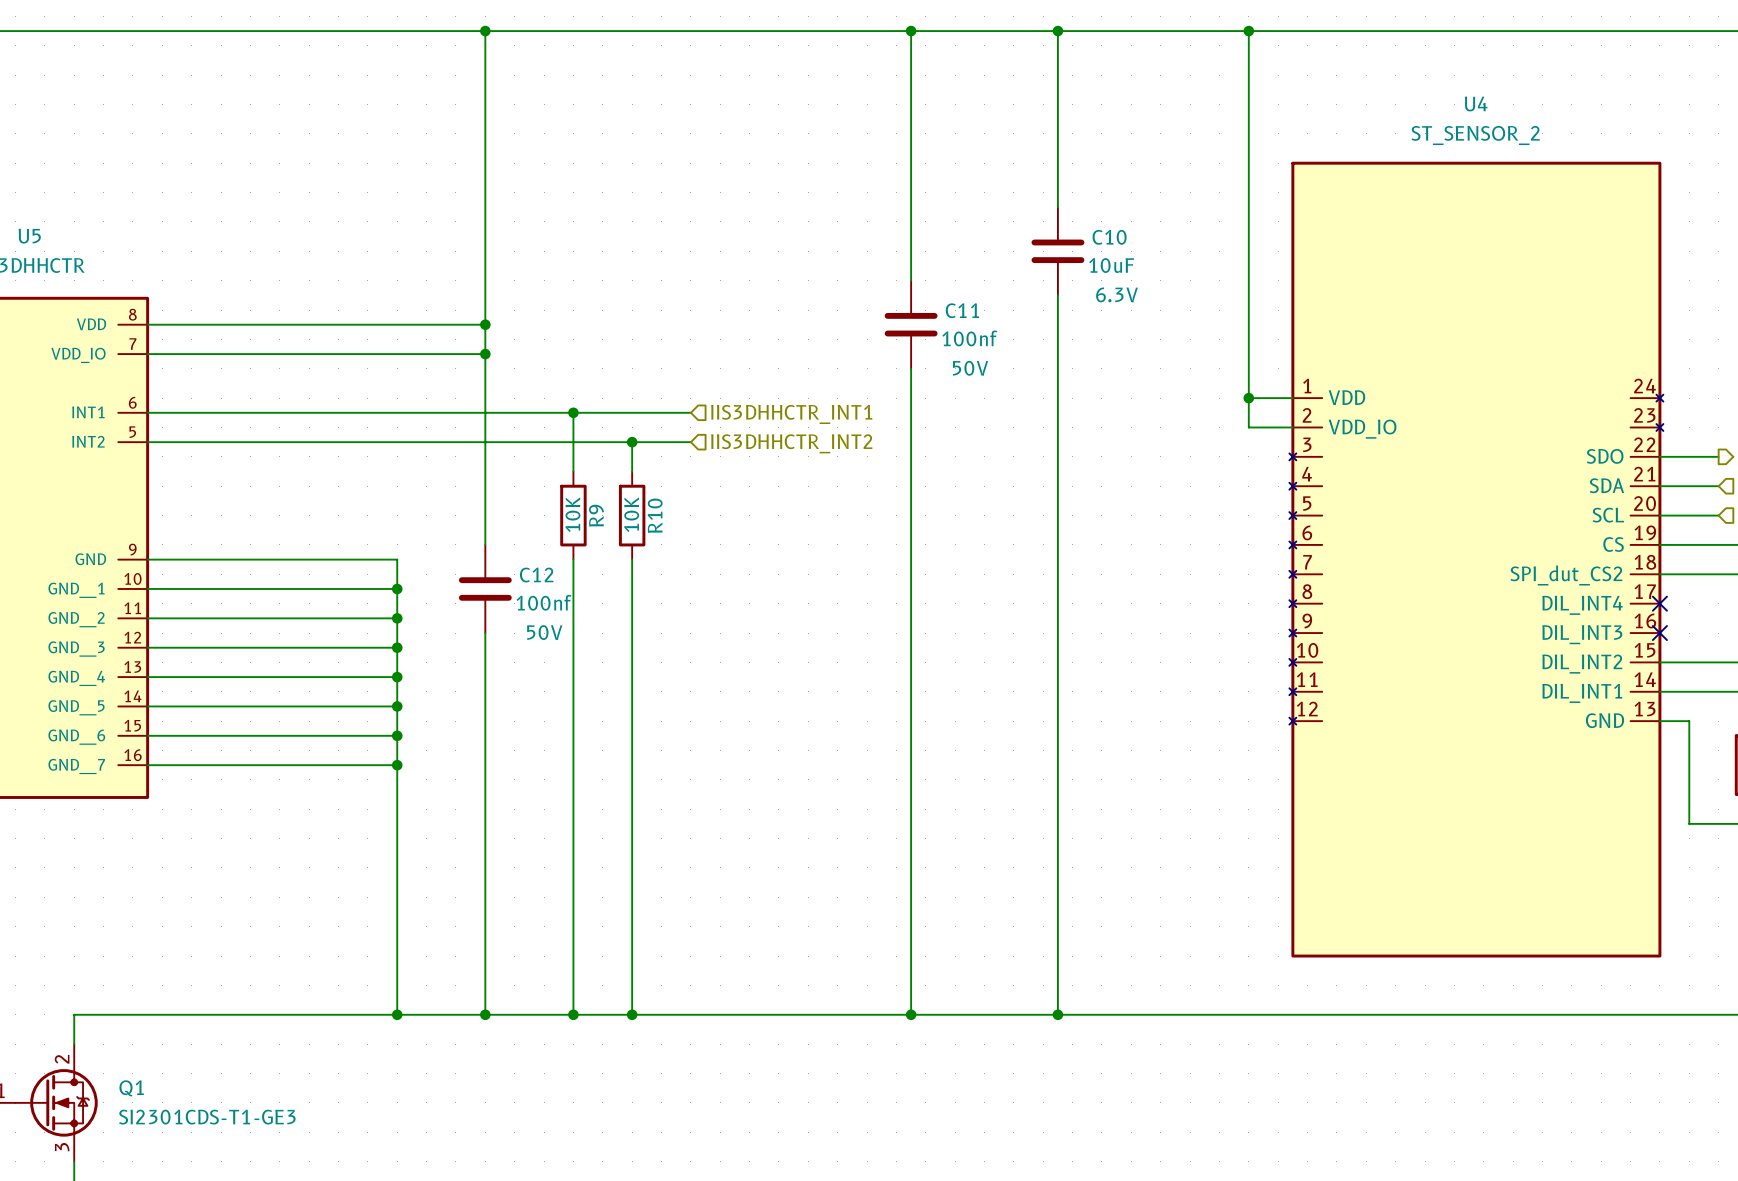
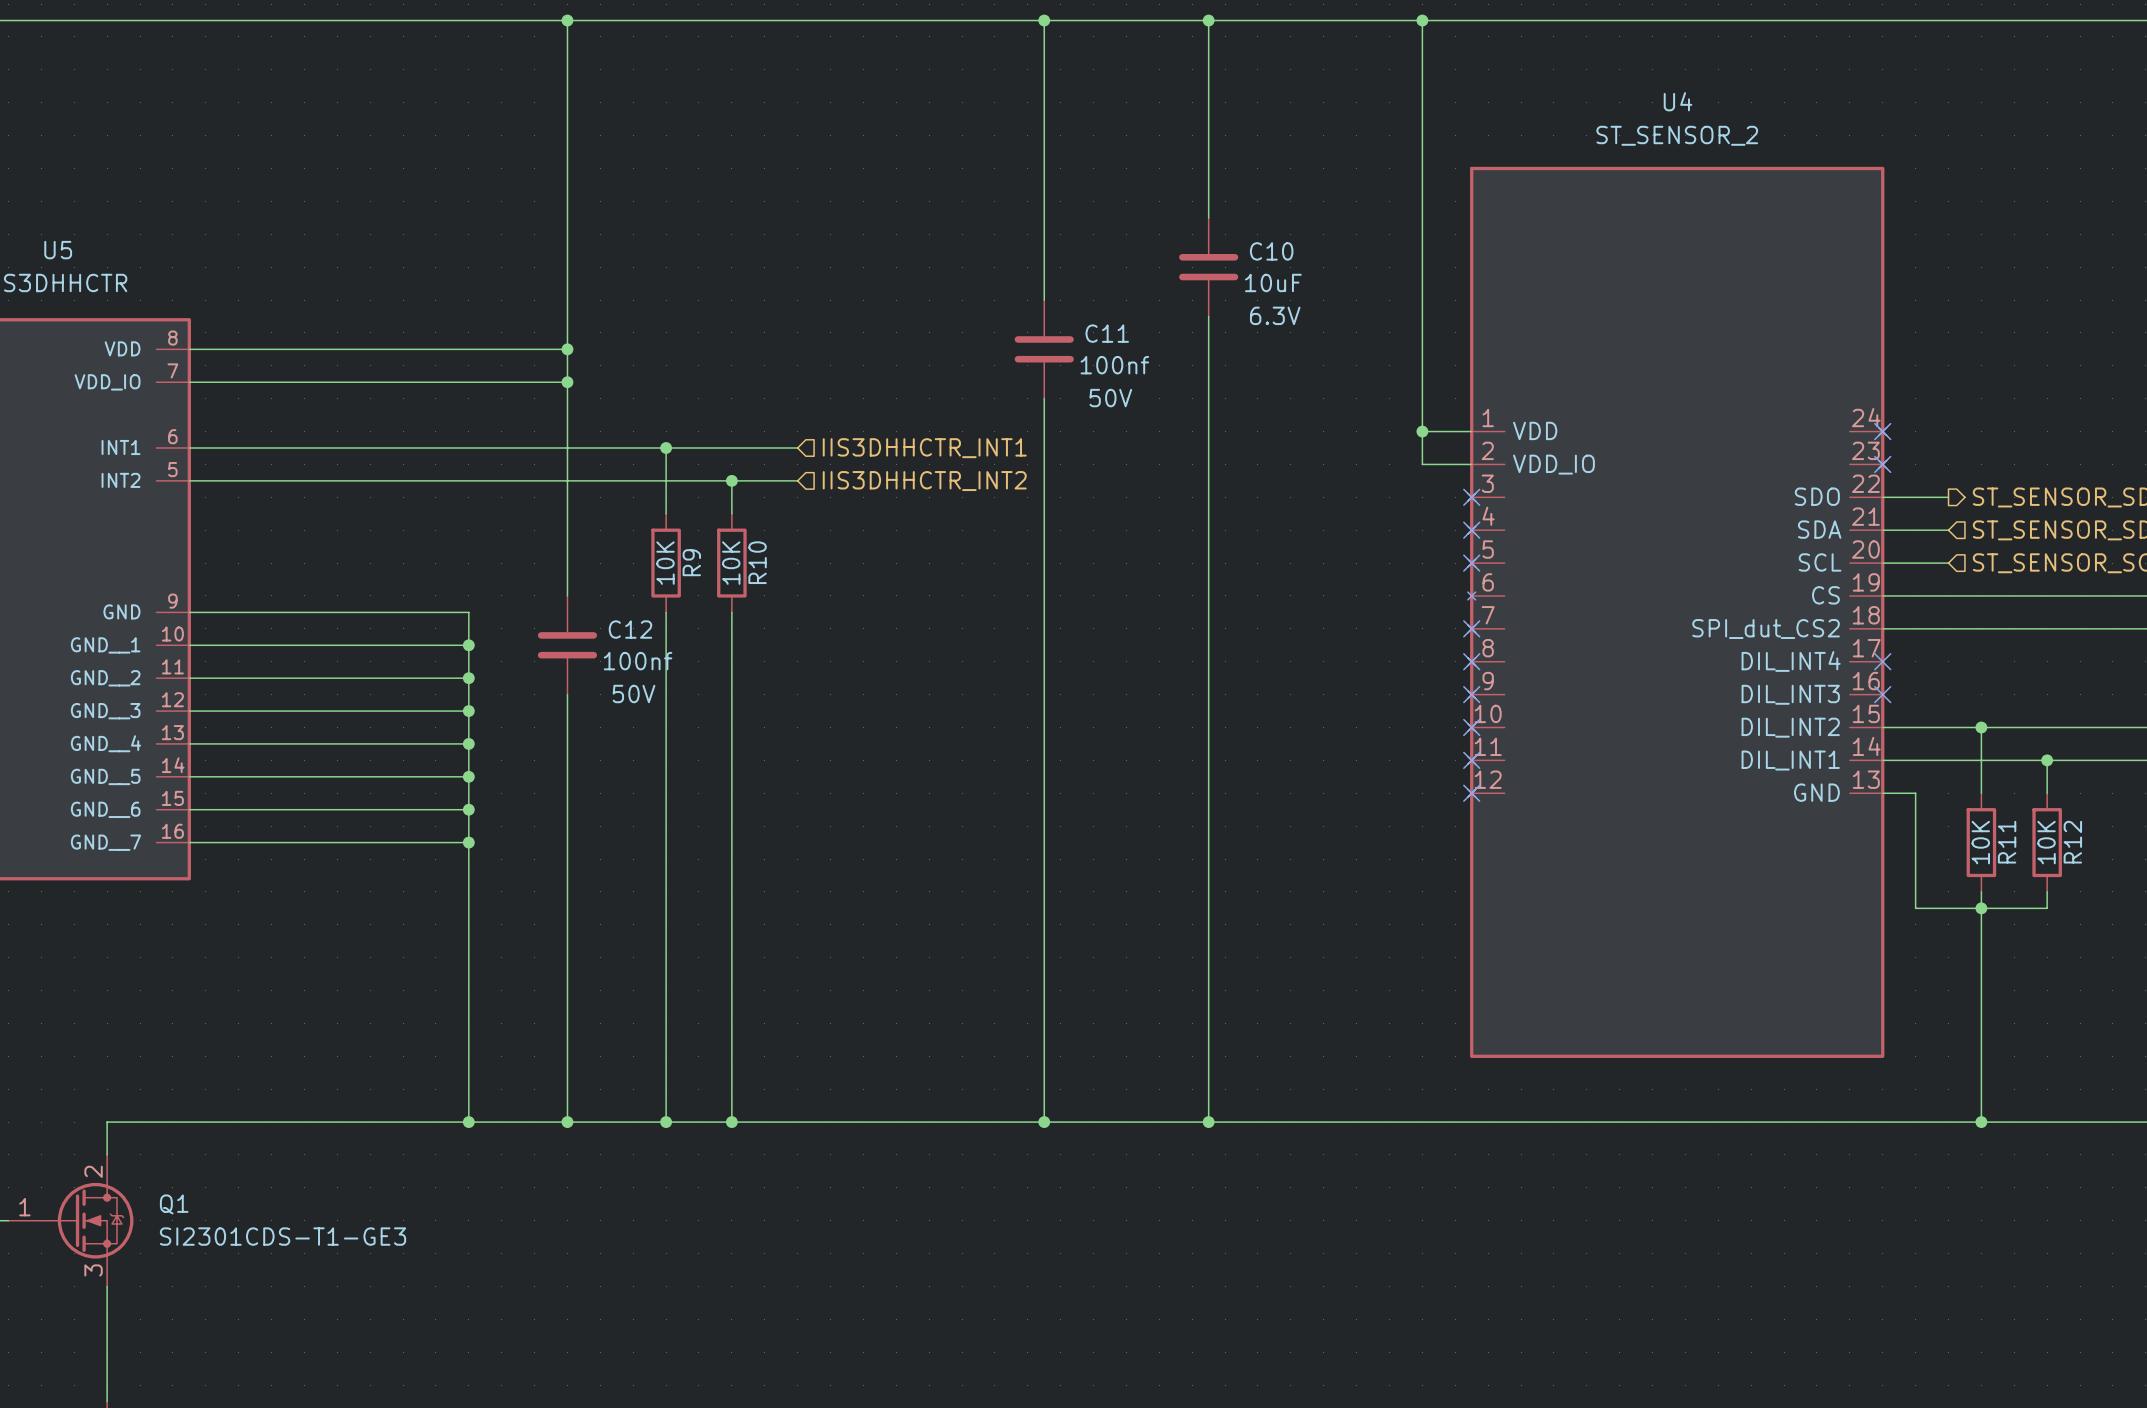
no-connect mark: none -> (1882, 431)
no-connect mark: none -> (1882, 464)
no-connect mark: none -> (1471, 497)
no-connect mark: none -> (1471, 530)
no-connect mark: none -> (1471, 563)
no-connect mark: none -> (1471, 628)
no-connect mark: none -> (1471, 661)
no-connect mark: none -> (1471, 694)
no-connect mark: none -> (1471, 727)
no-connect mark: none -> (1471, 760)
no-connect mark: none -> (1471, 793)

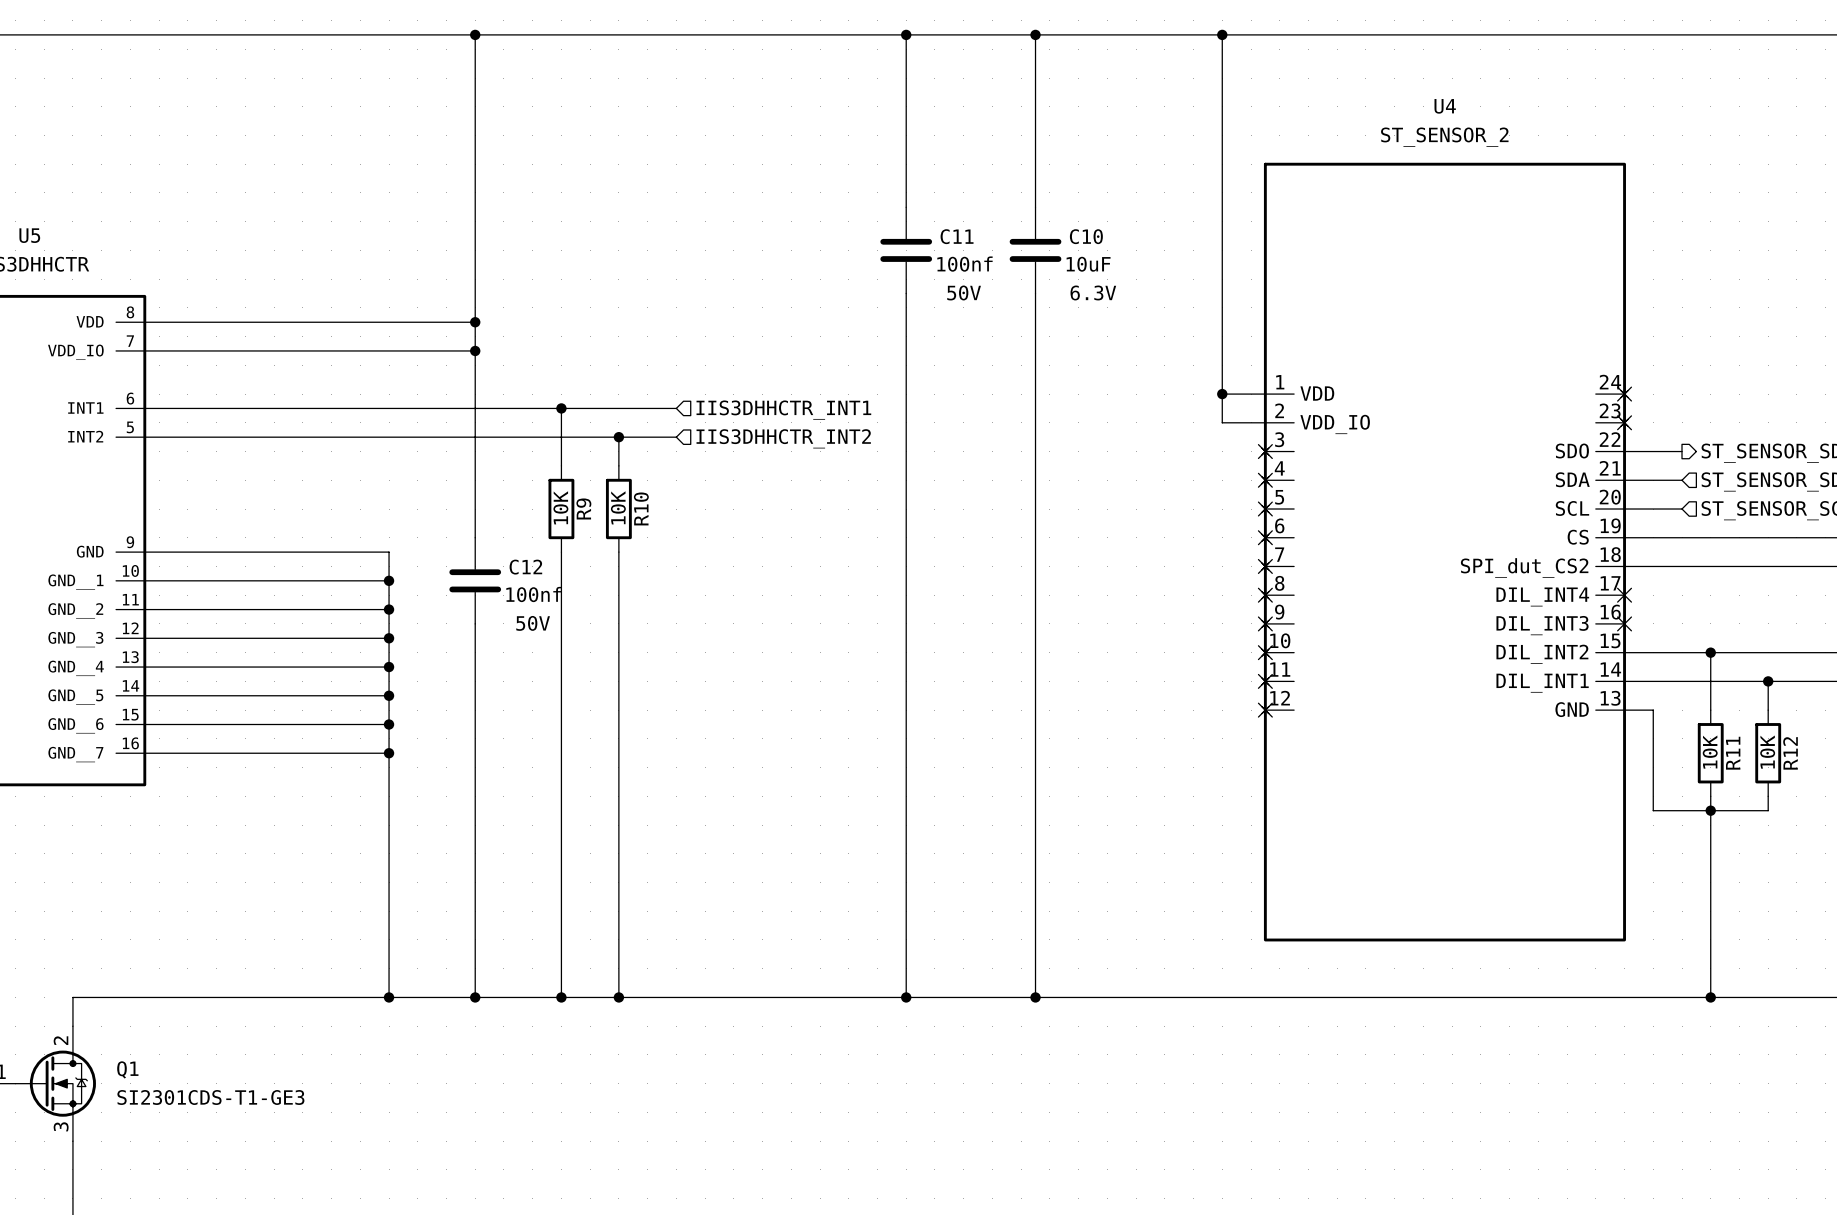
wire: (1044, 20) (1044, 300) -> none
junction position: (1044, 20) -> (906, 34)
wire: none -> (906, 34) (906, 207)
wire: none -> (906, 293) (906, 997)
C11 position: (1044, 349) -> (906, 250)
wire: (1044, 398) (1044, 1122) -> none
no-connect mark: none -> (1265, 537)
junction position: (1044, 1122) -> (906, 997)

